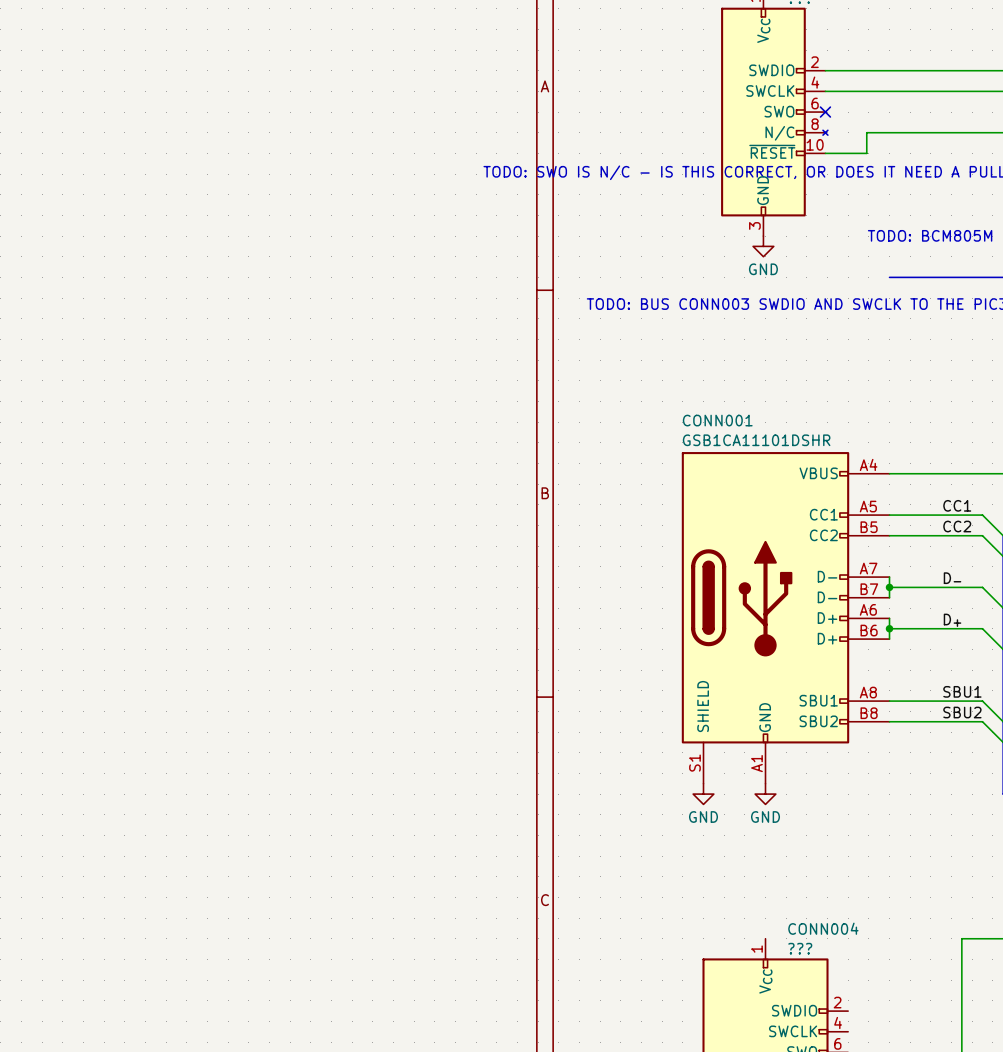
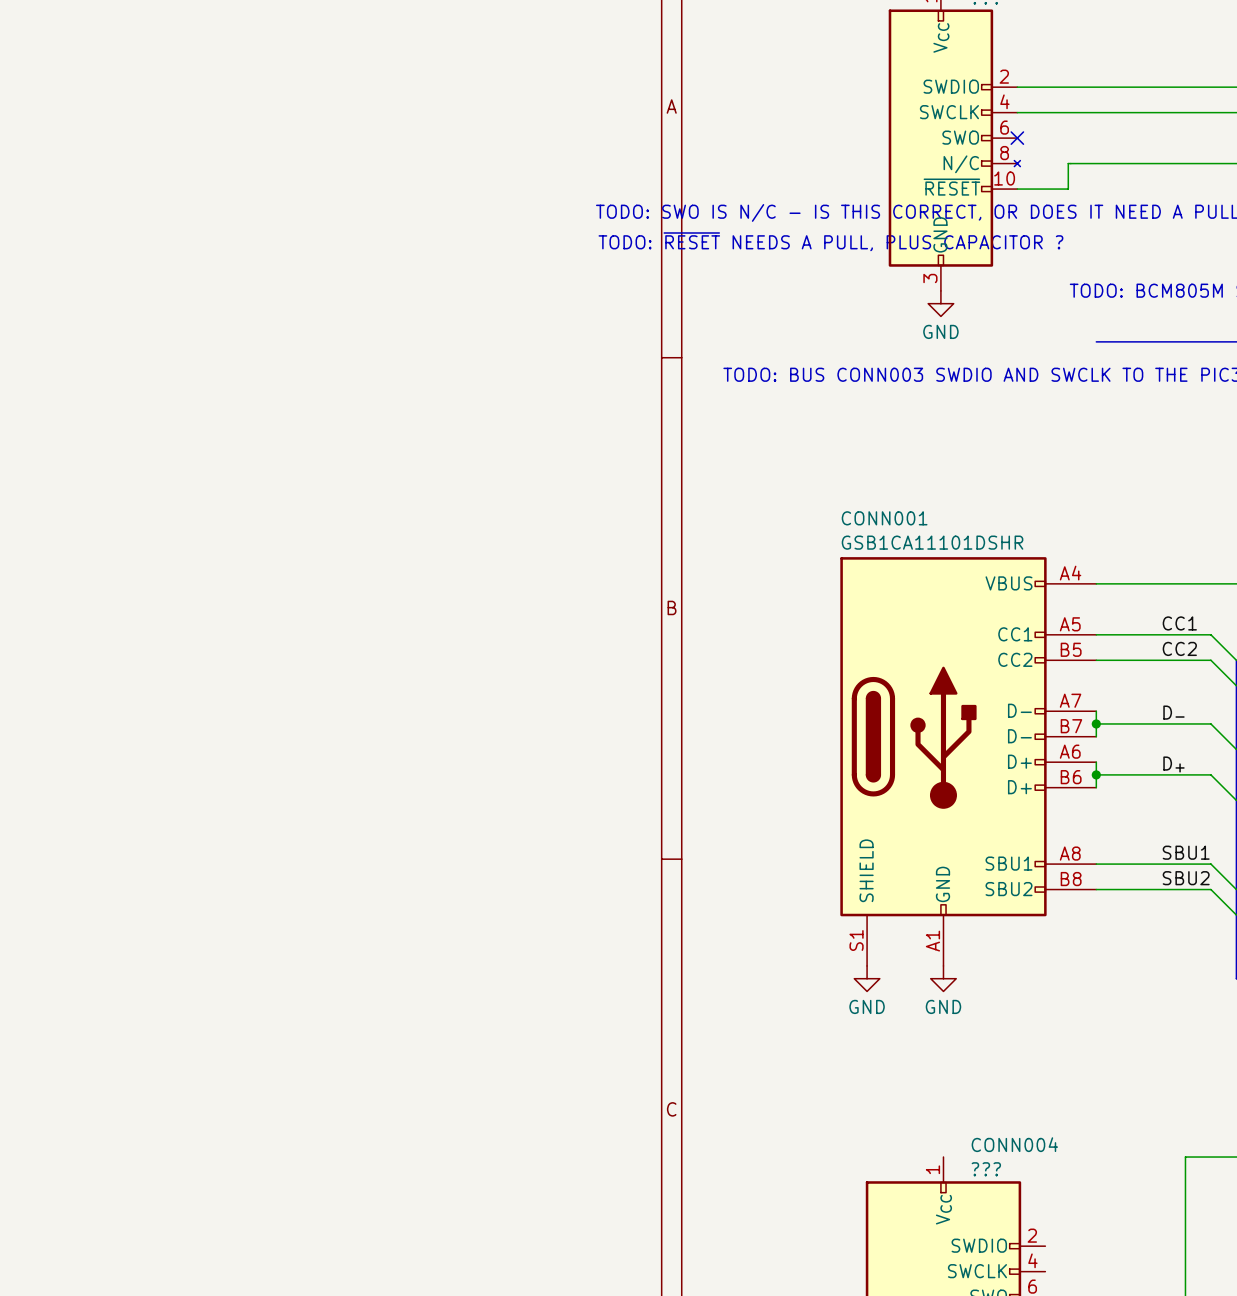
text: none -> TODO: ~{RESET} NEEDS A PULL, PLUS CAPACITOR ? (830, 241)

